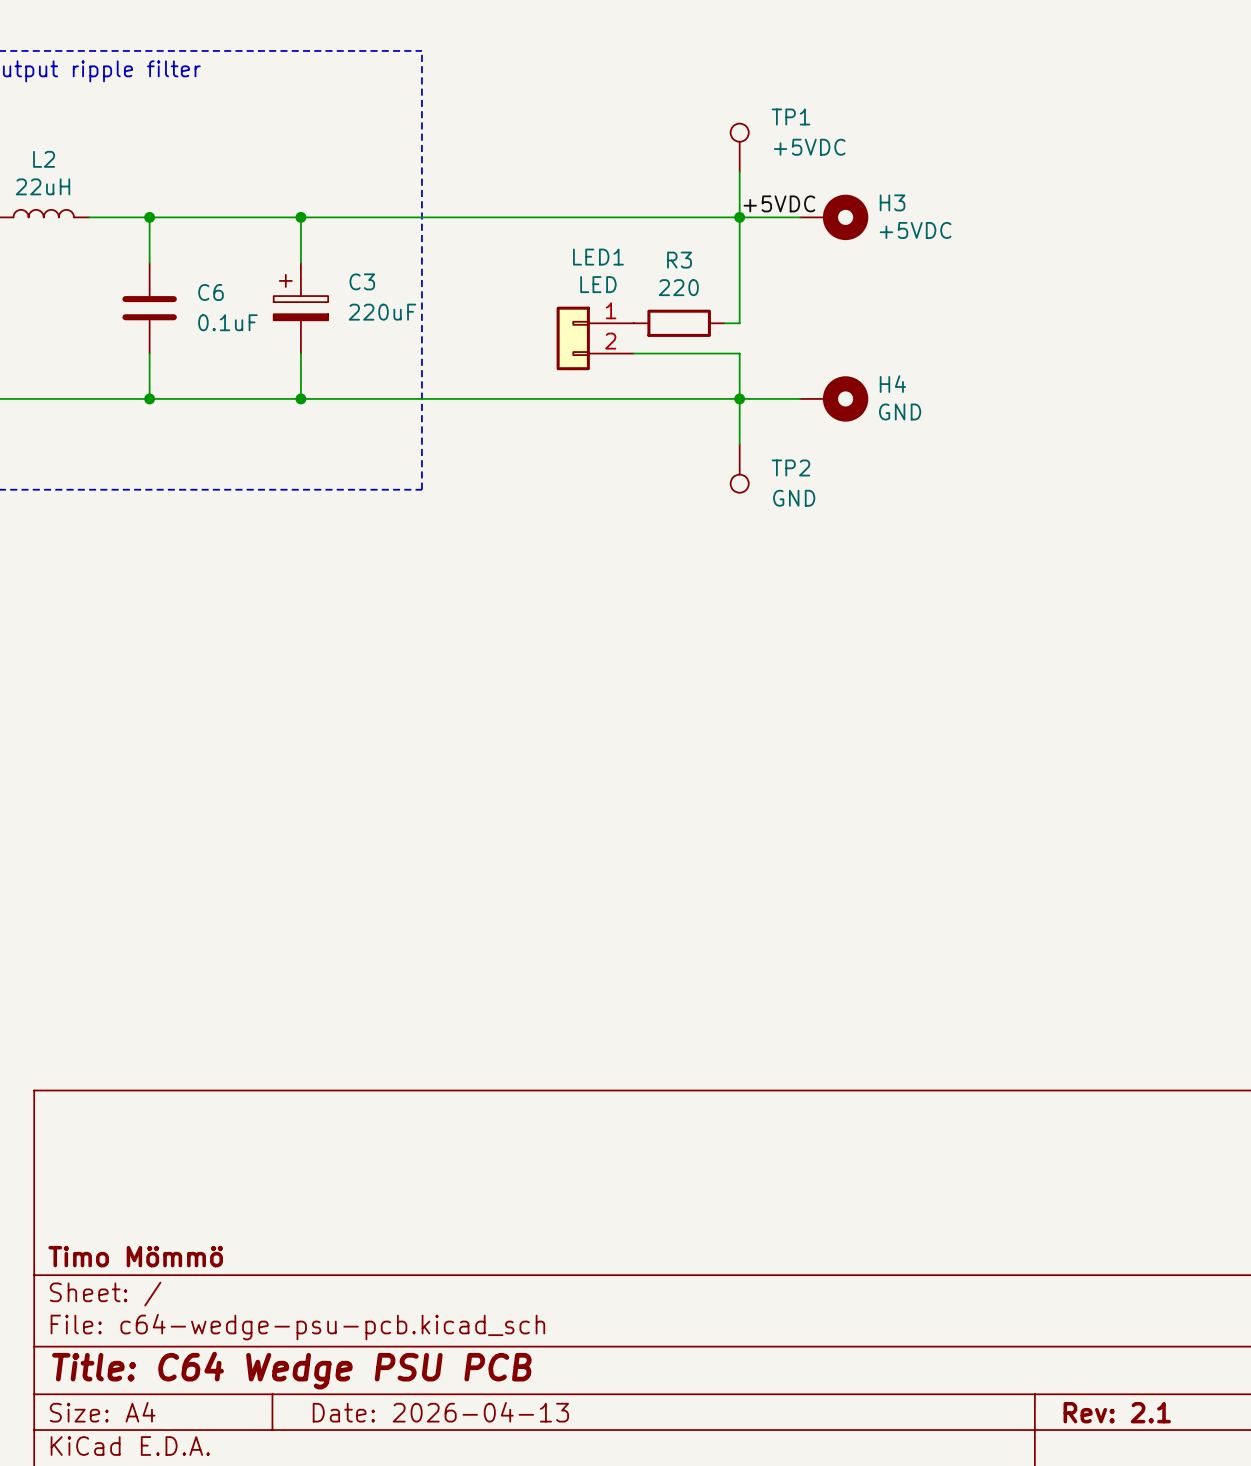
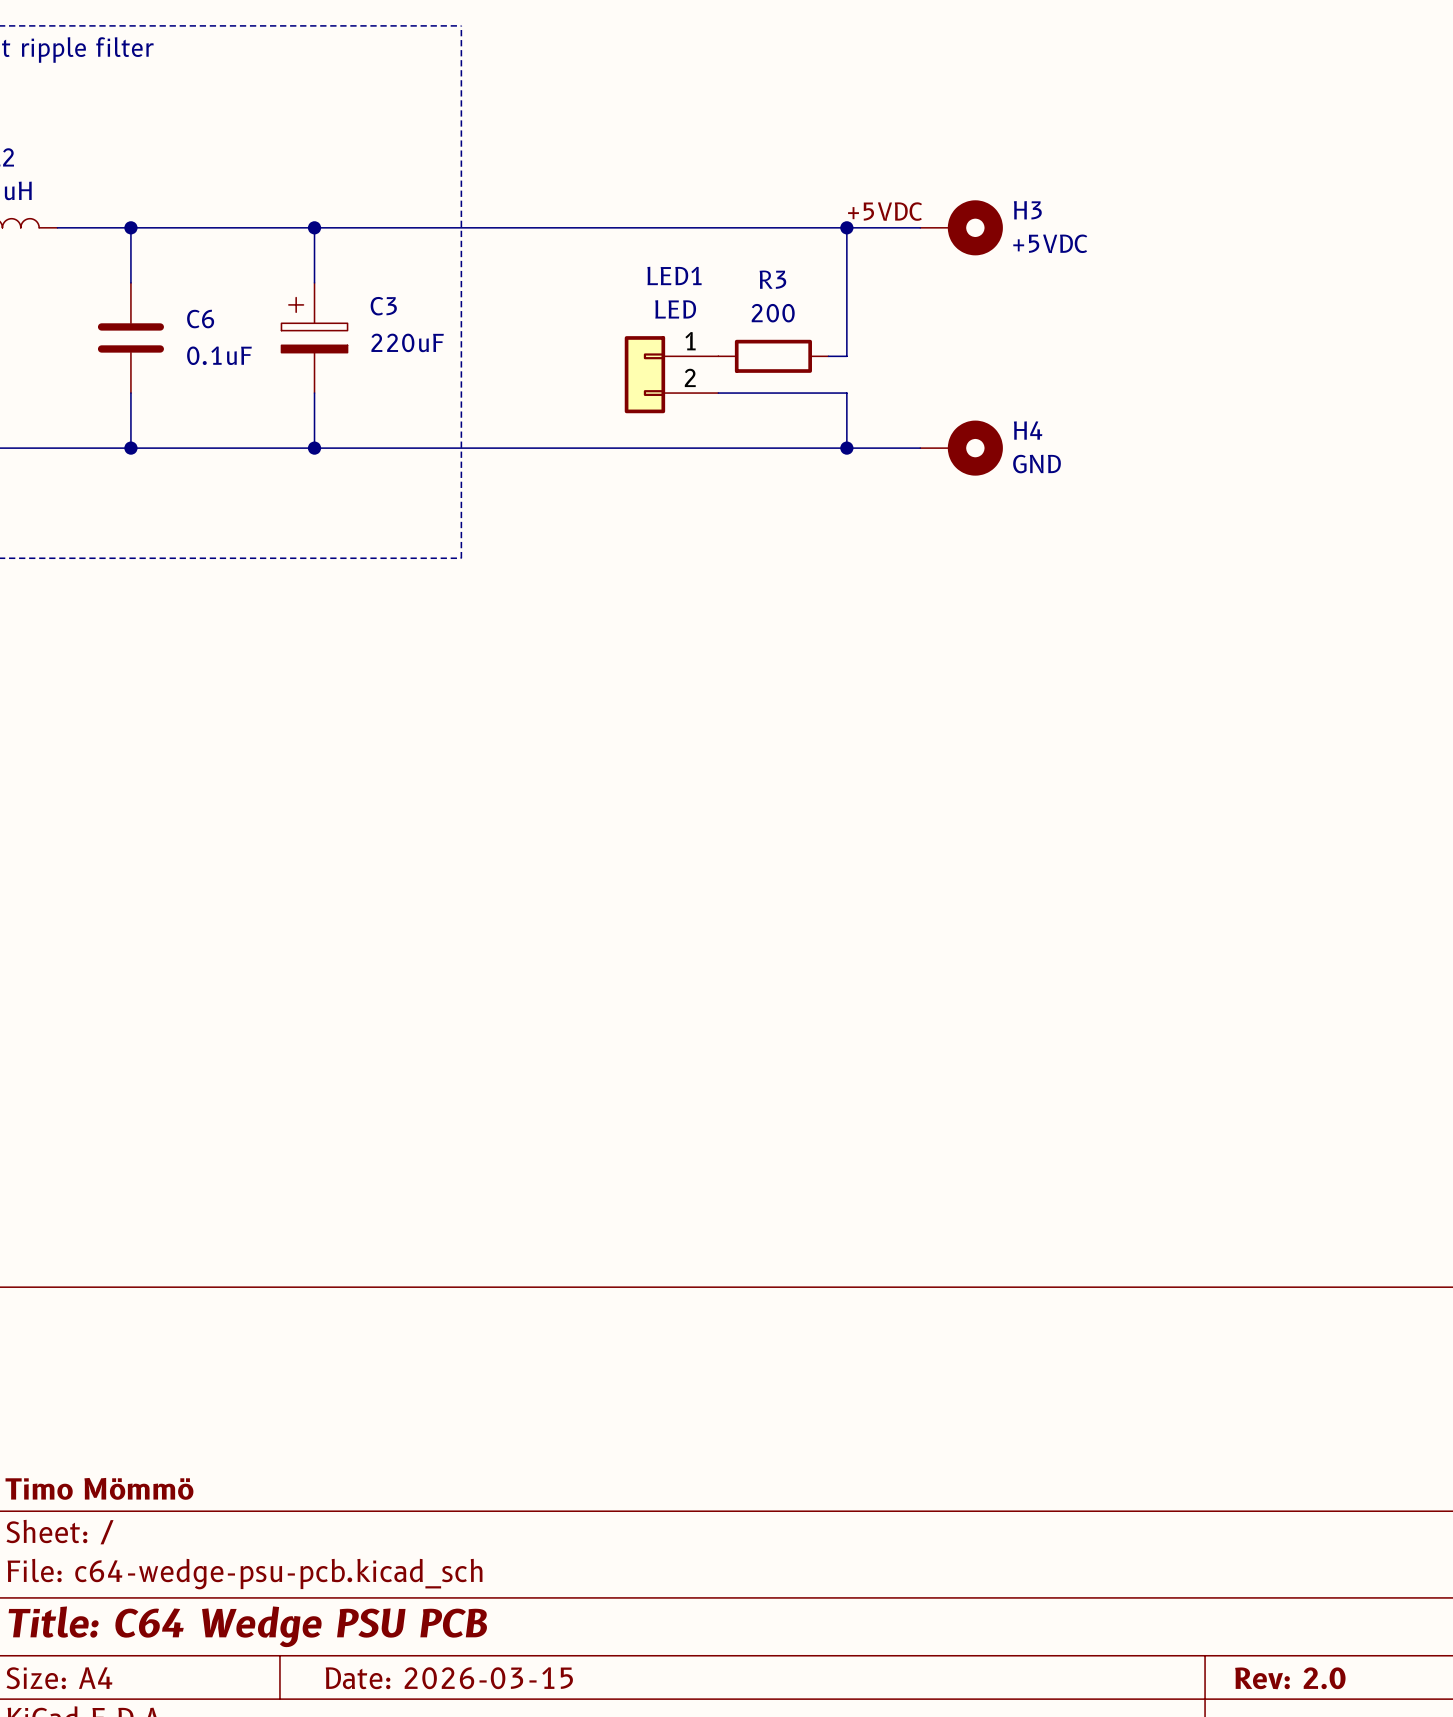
TP1: +5VDC (739, 147) -> none
wire: (739, 172) (739, 217) -> none
R3 value: 220 (678, 287) -> 200 (773, 313)
wire: (739, 398) (739, 444) -> none
TP2: GND (739, 468) -> none
title block: Date: 2026-04-13 (440, 1412) -> Date: 2026-03-15 (449, 1678)
title block: Rev: 2.1 (1117, 1412) -> Rev: 2.0 (1290, 1678)

